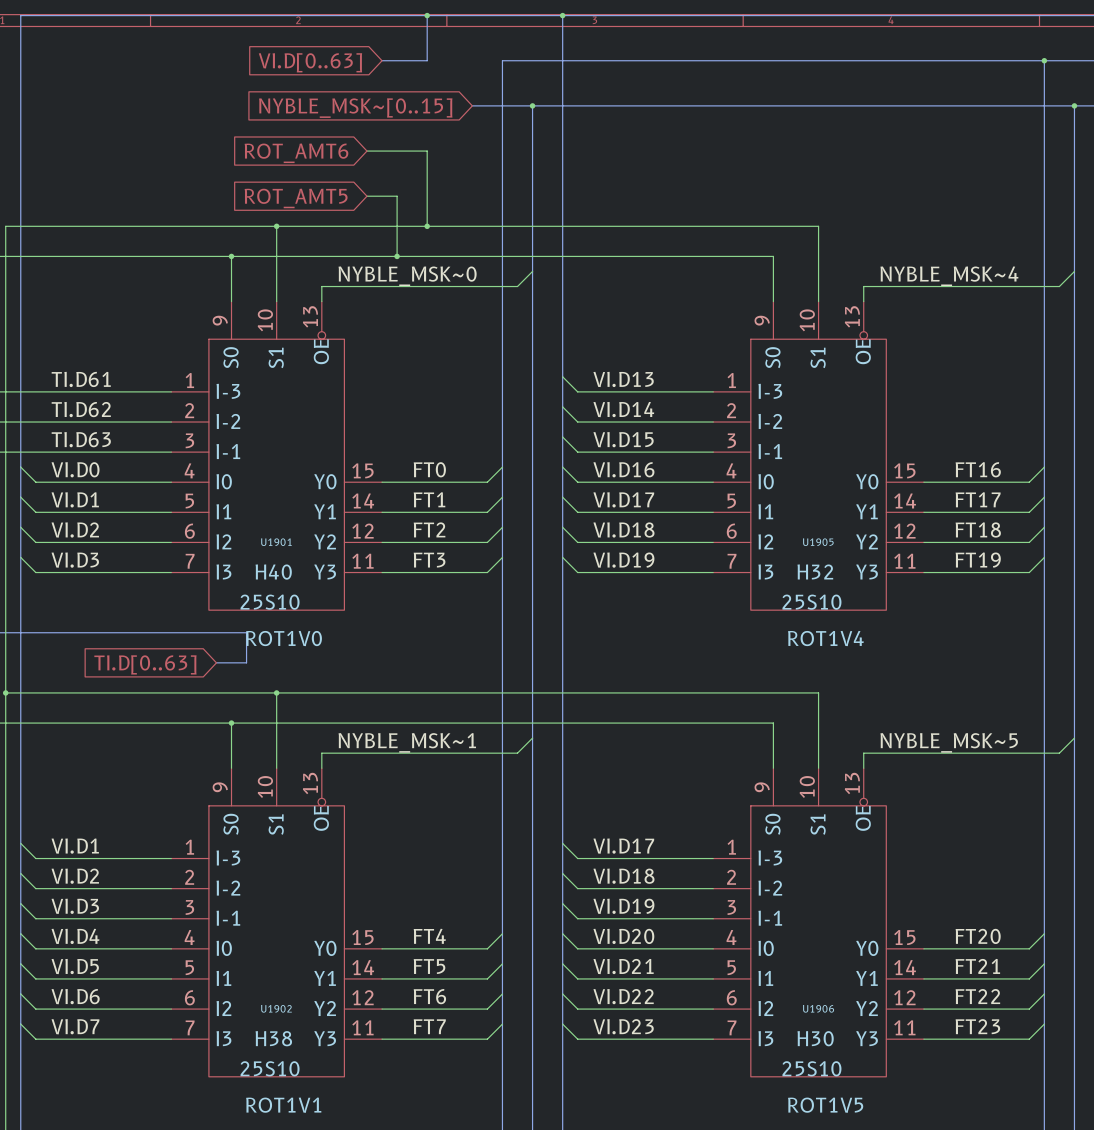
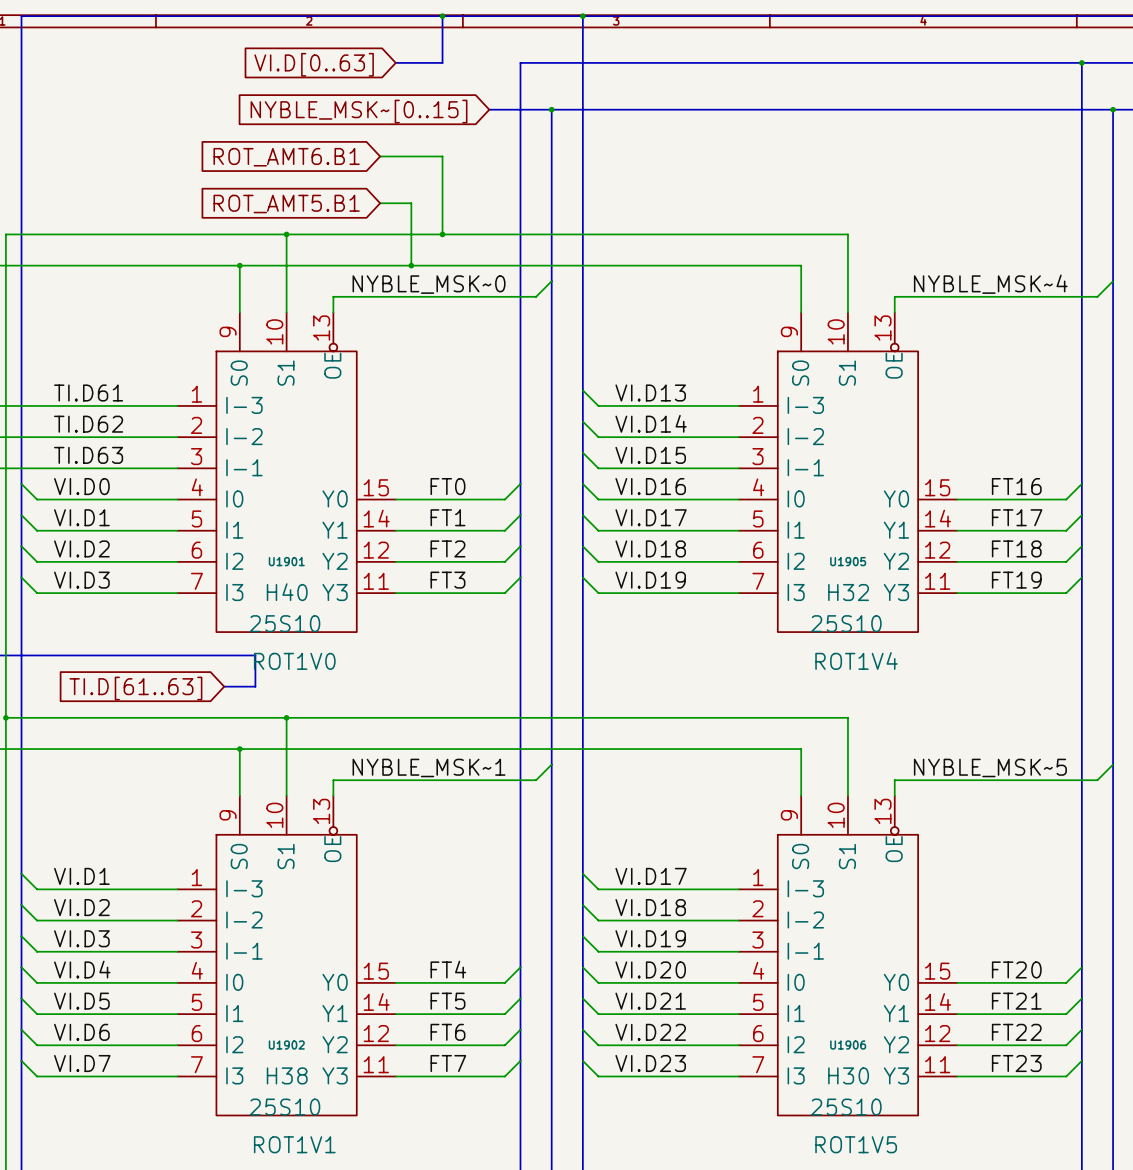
global label: ROT_AMT6 (296, 153) -> ROT_AMT6.B1 (286, 157)
global label: ROT_AMT5 (296, 198) -> ROT_AMT5.B1 (286, 204)
global label: TI.D[0..63] (145, 664) -> TI.D[61..63] (135, 688)

